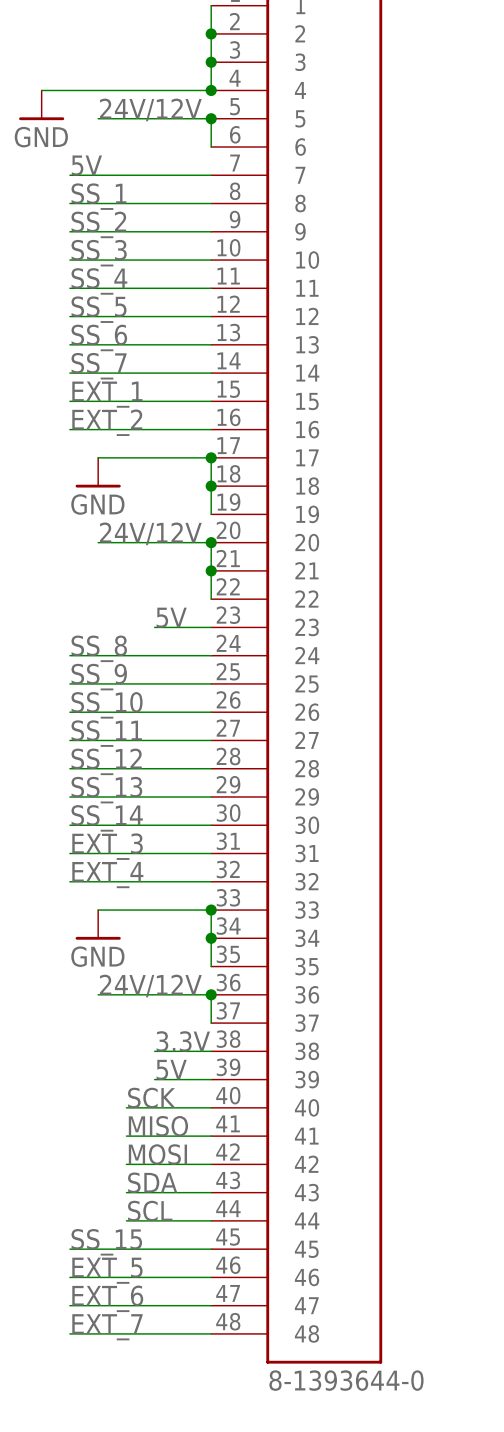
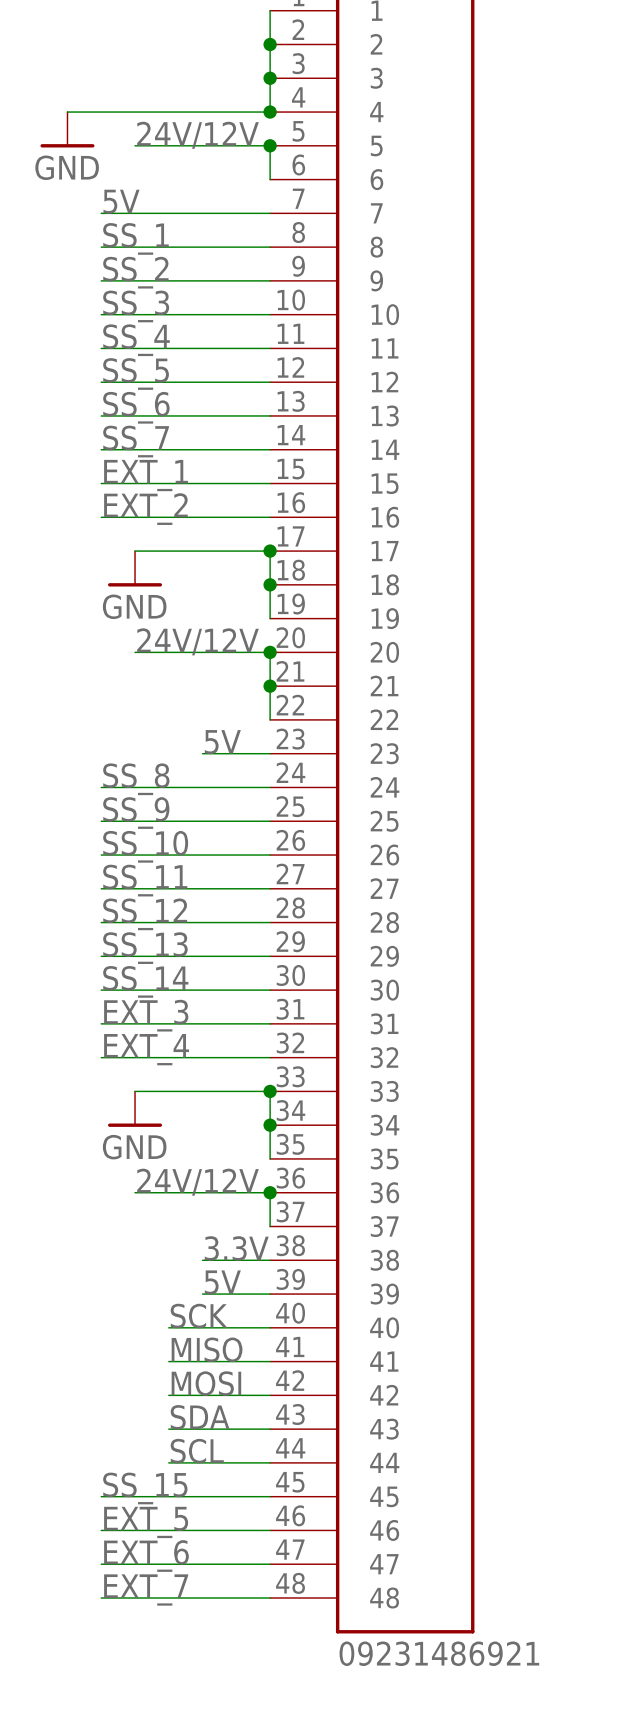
part value: 8-1393644-0 (346, 1380) -> 09231486921 (439, 1653)

